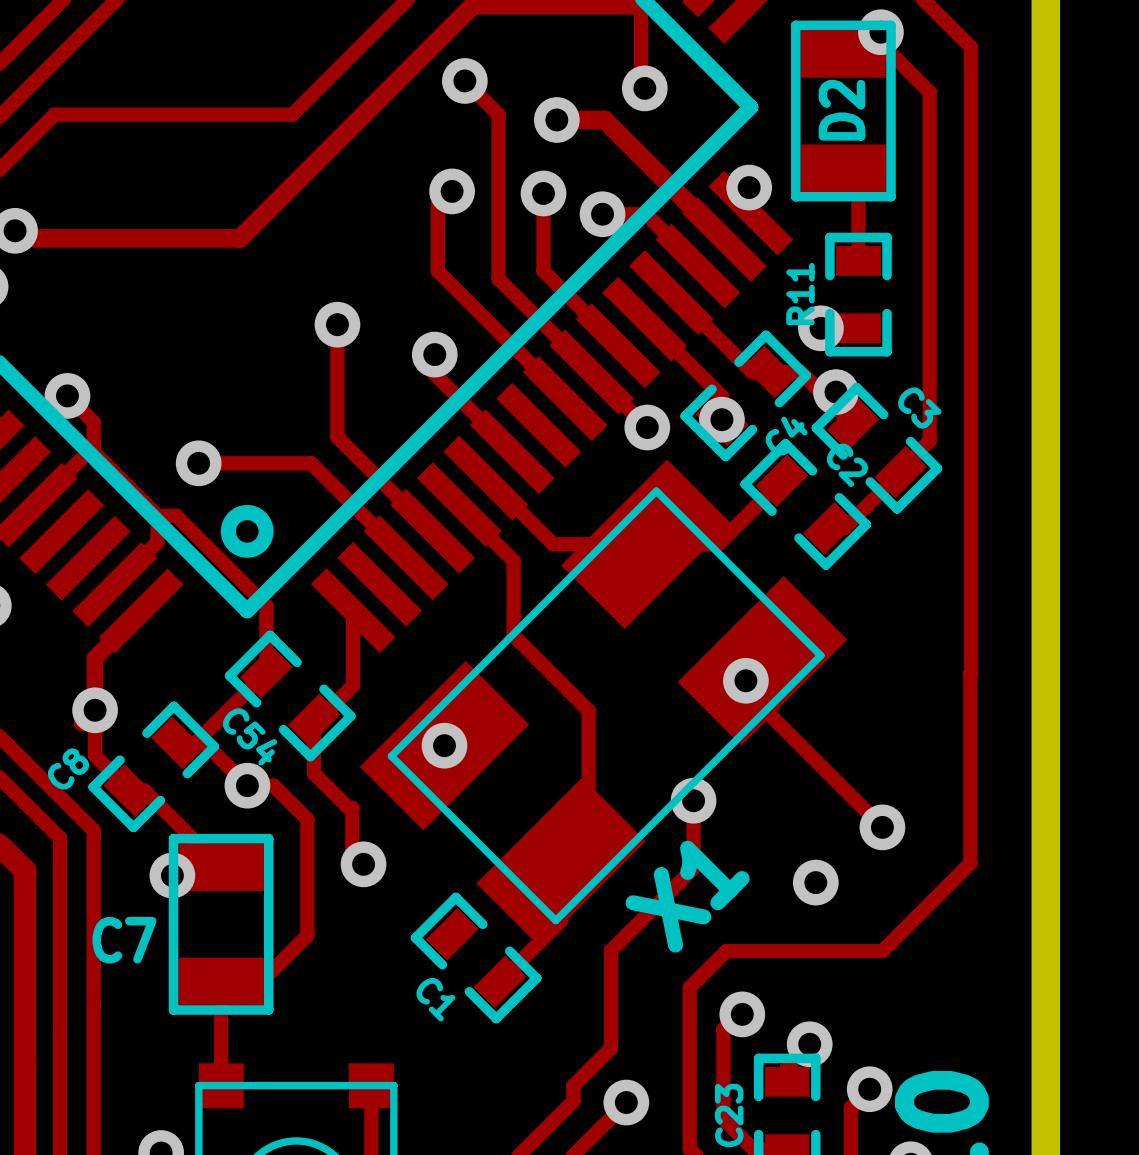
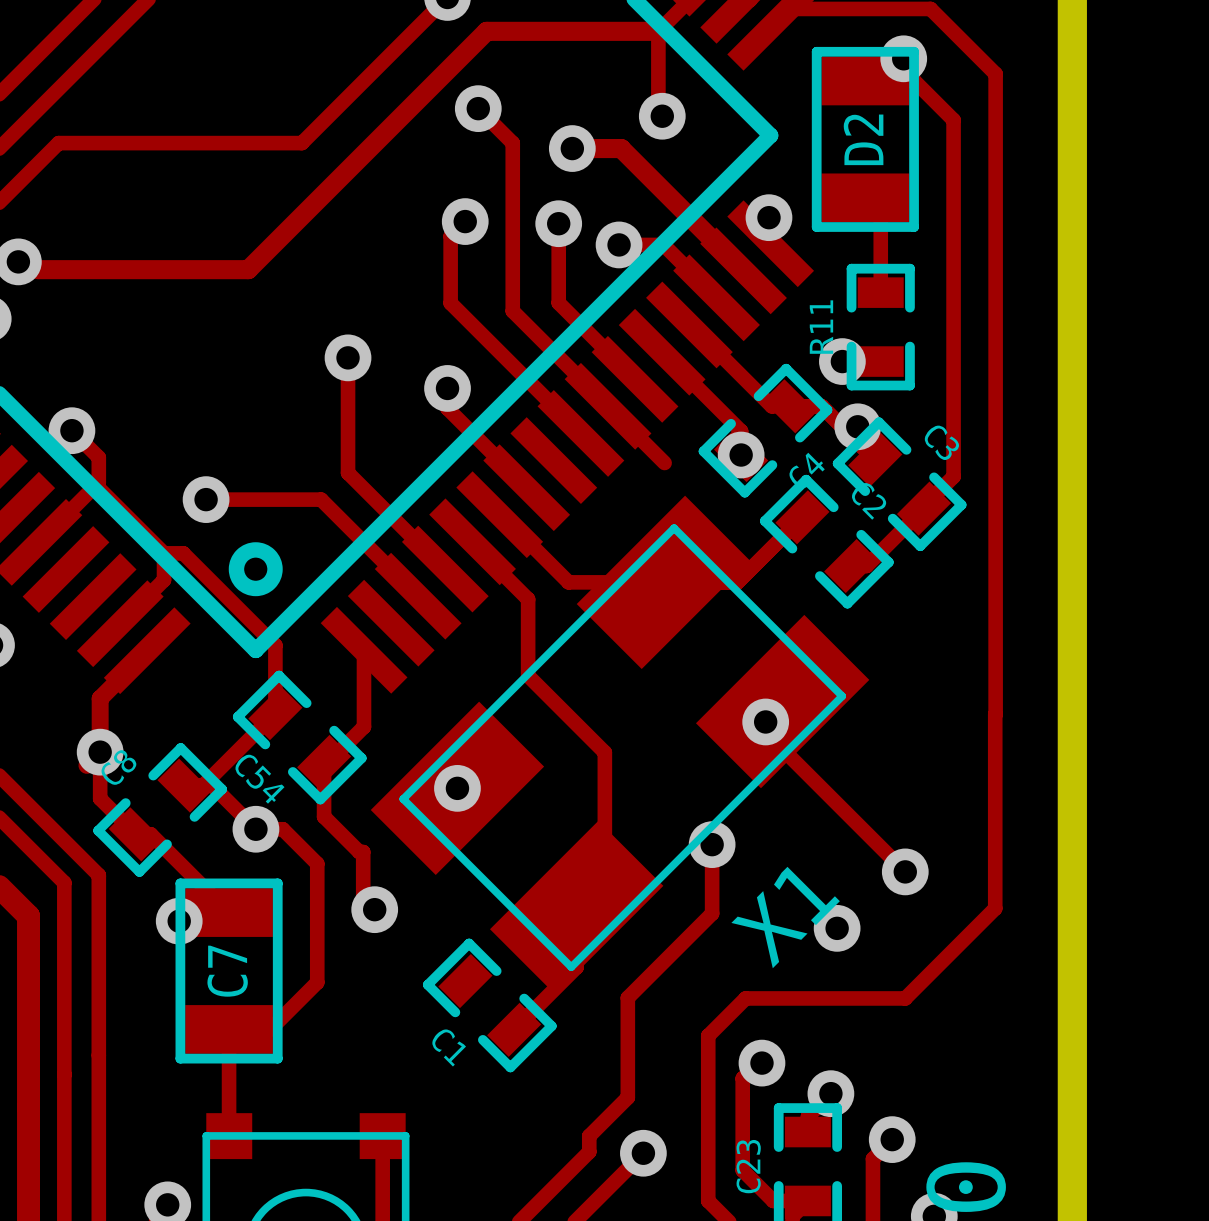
via: (647, 427) -> none
C8 name position: C8 (68, 768) -> C8 (118, 767)
X1 name position: X1 (687, 896) -> X1 (785, 917)
C7 name rotation: 0° (124, 940) -> 90° counterclockwise (227, 971)
C7 name position: C7 (124, 940) -> C7 (227, 971)

